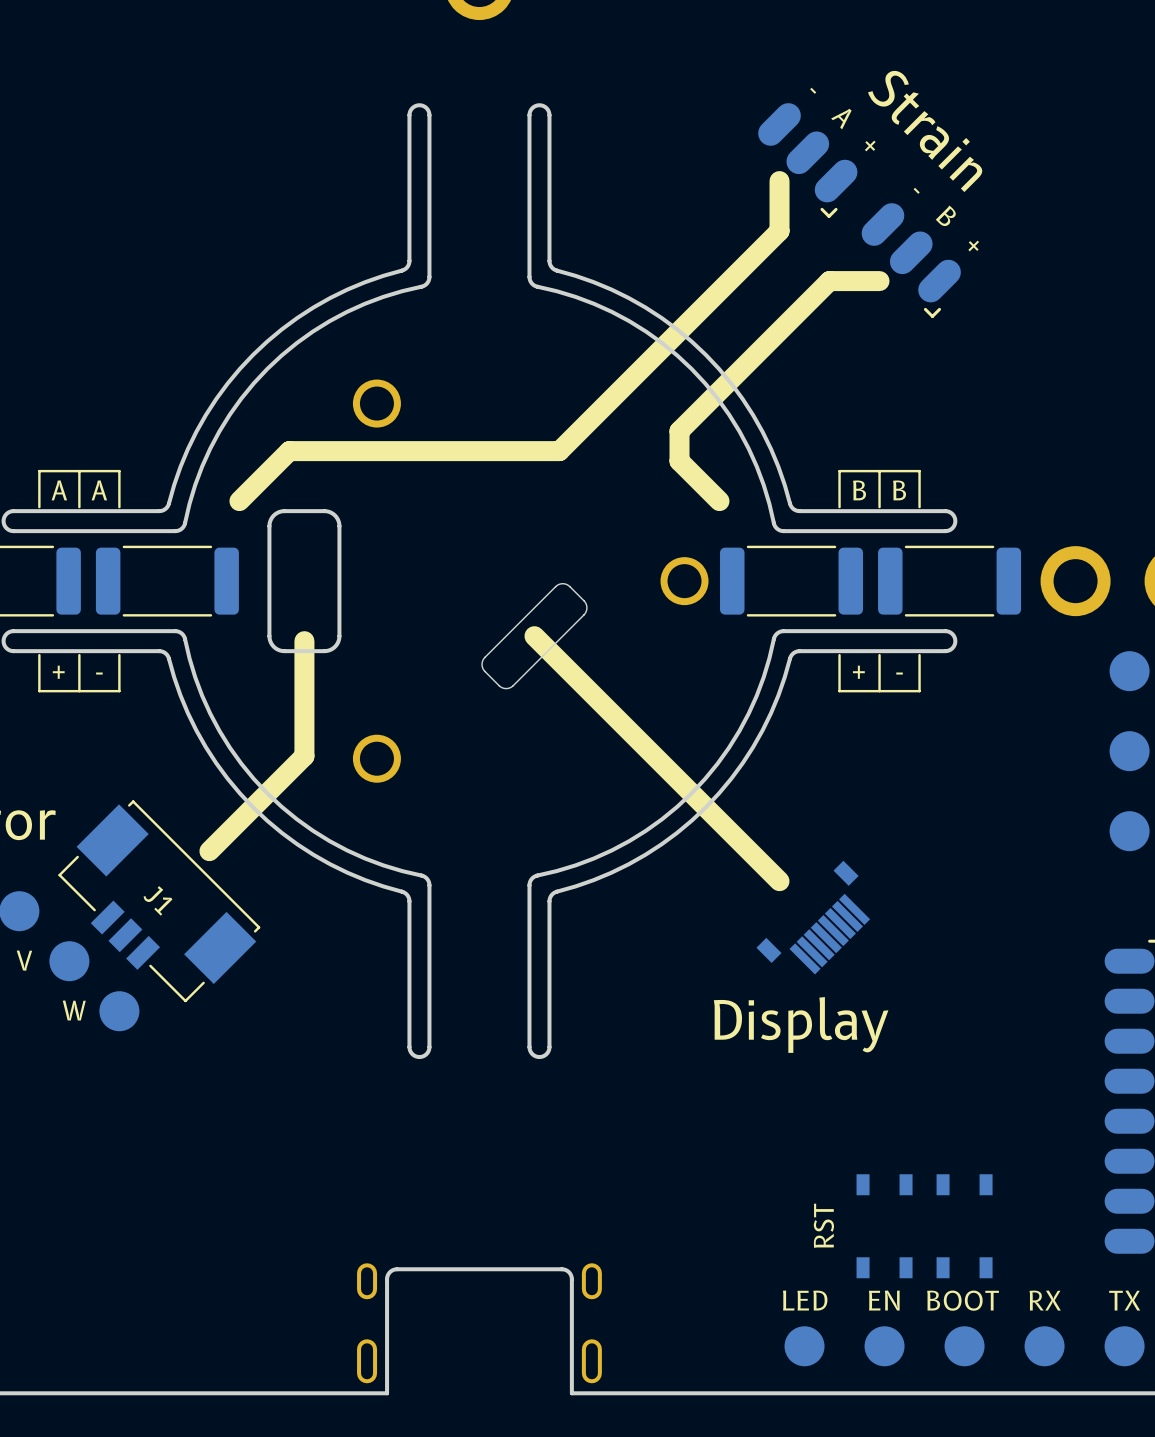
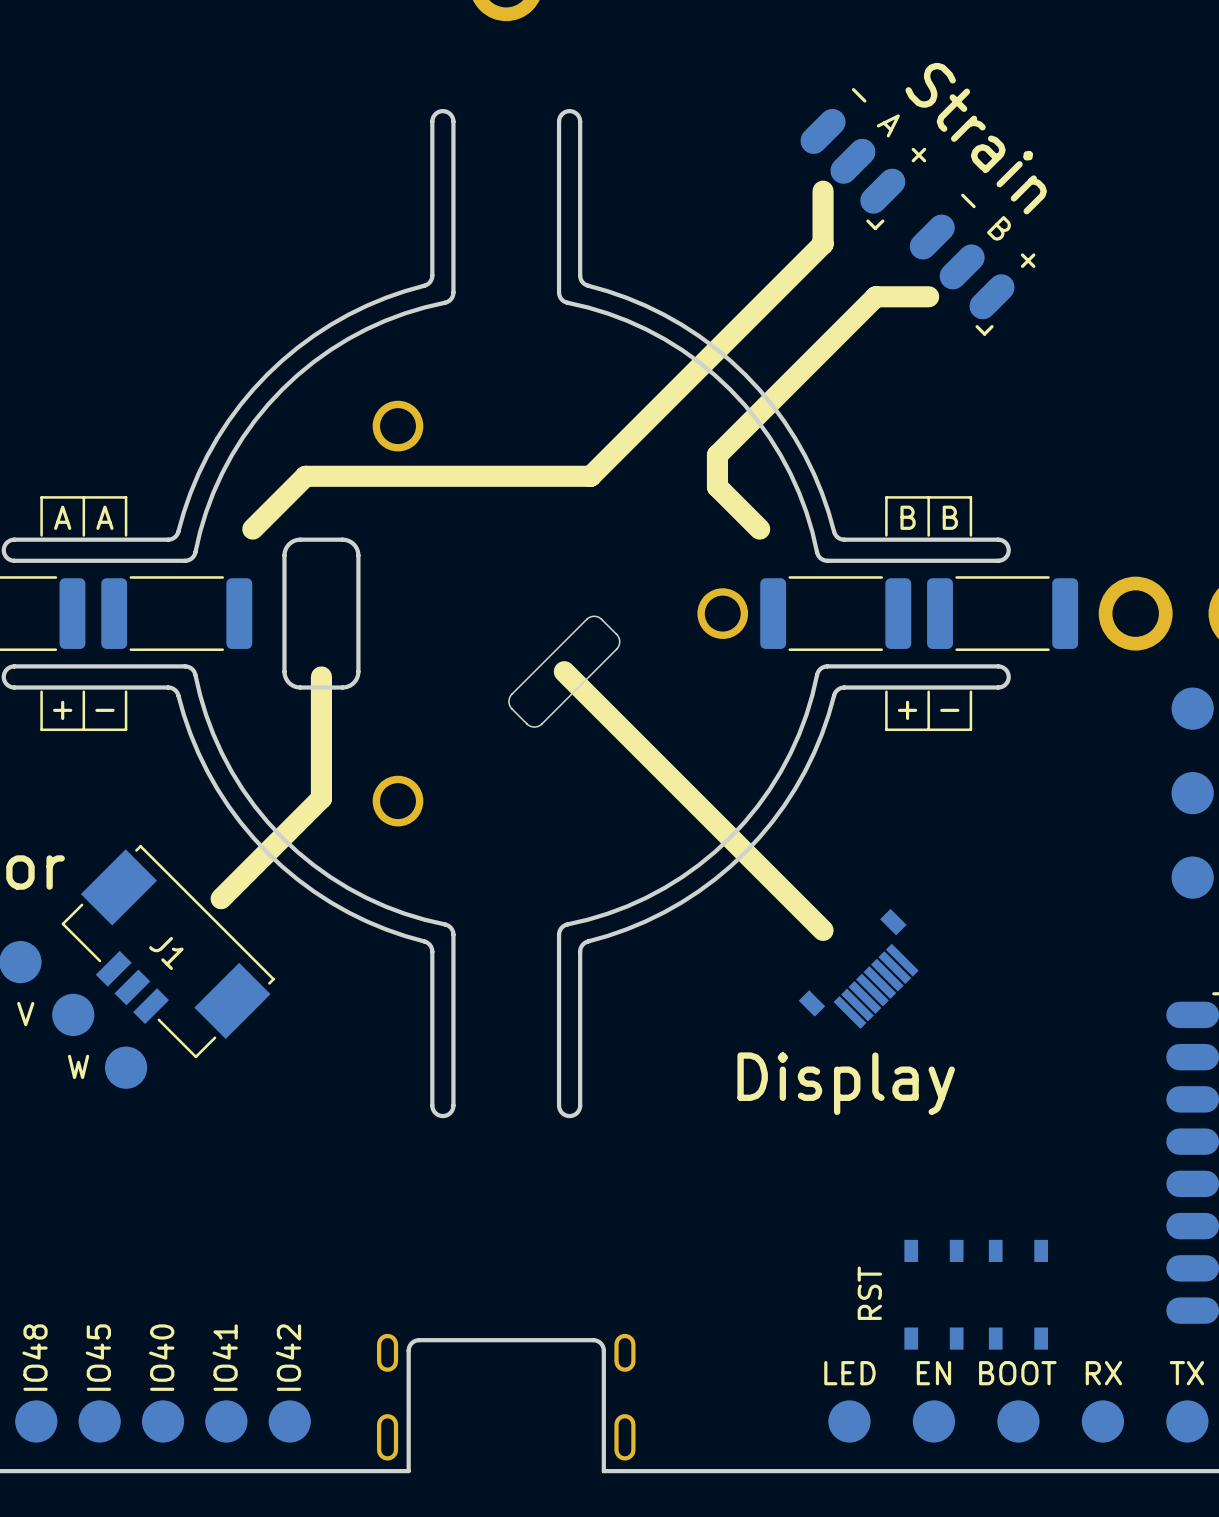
part: none -> IO48 (36, 1421)
part: none -> IO45 (99, 1421)
part: none -> IO40 (163, 1421)
part: none -> IO41 (226, 1421)
part: none -> IO42 (289, 1421)

